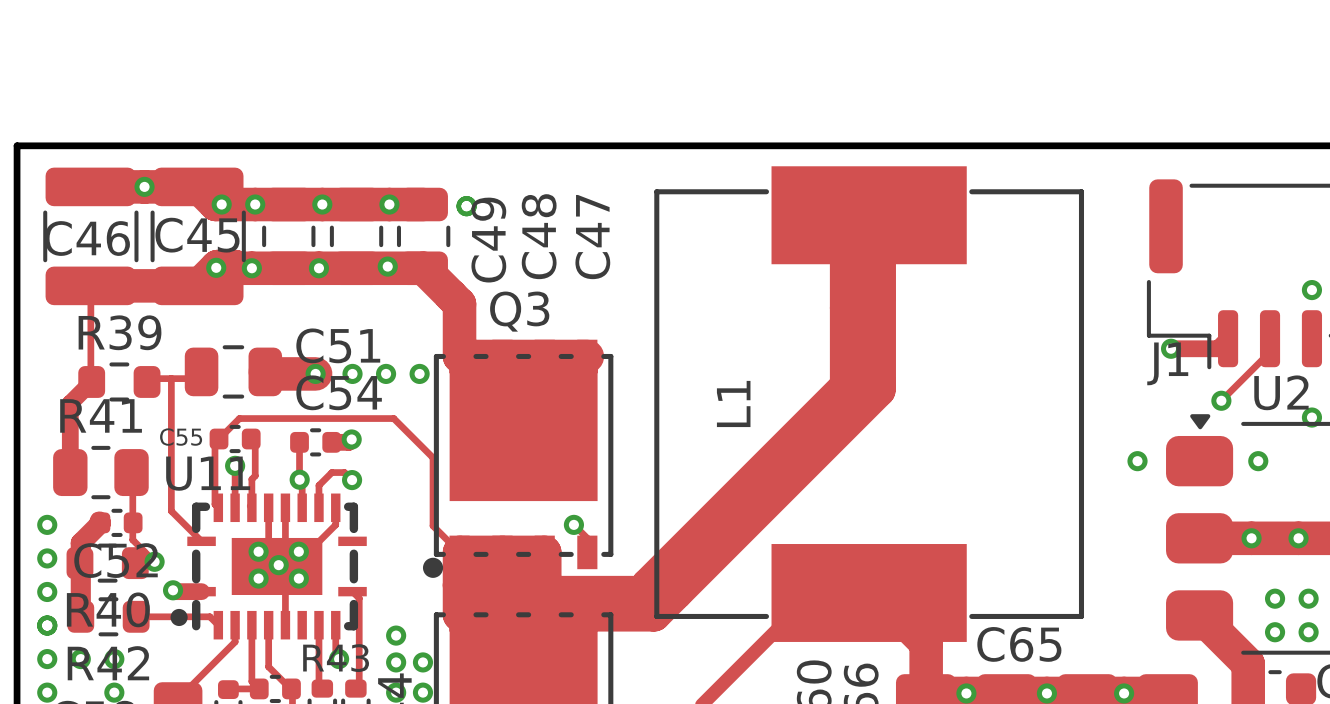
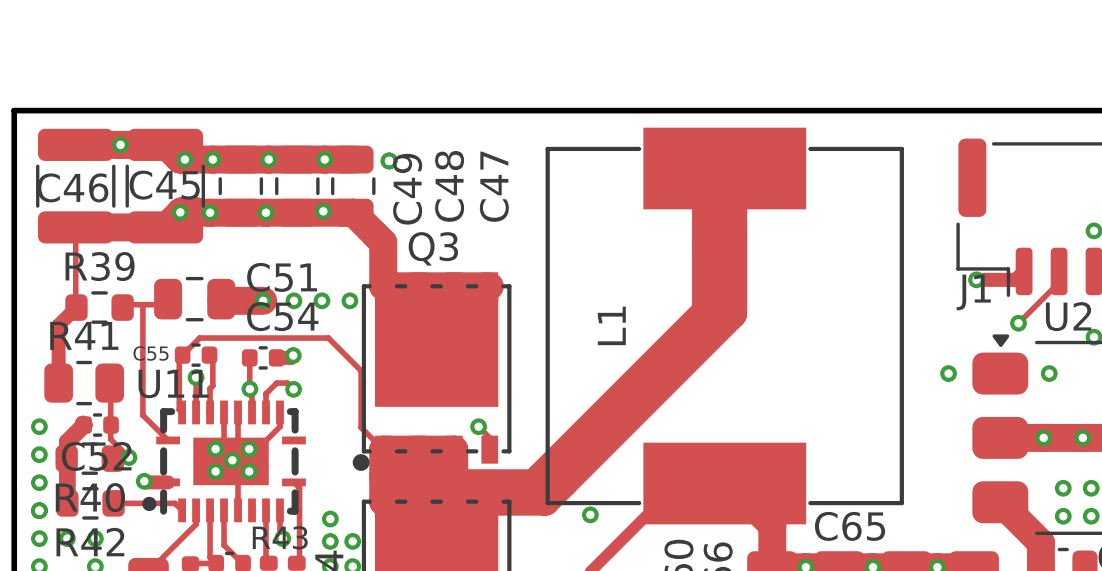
via: none -> (590, 514)

